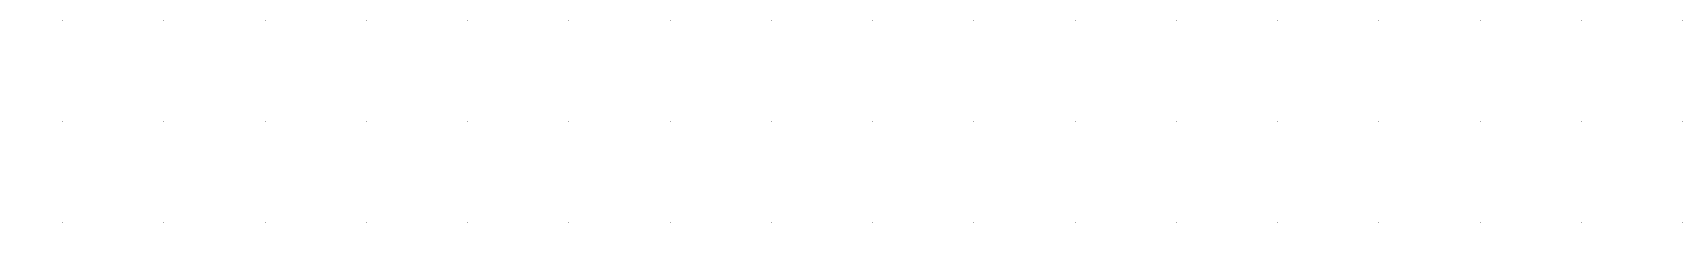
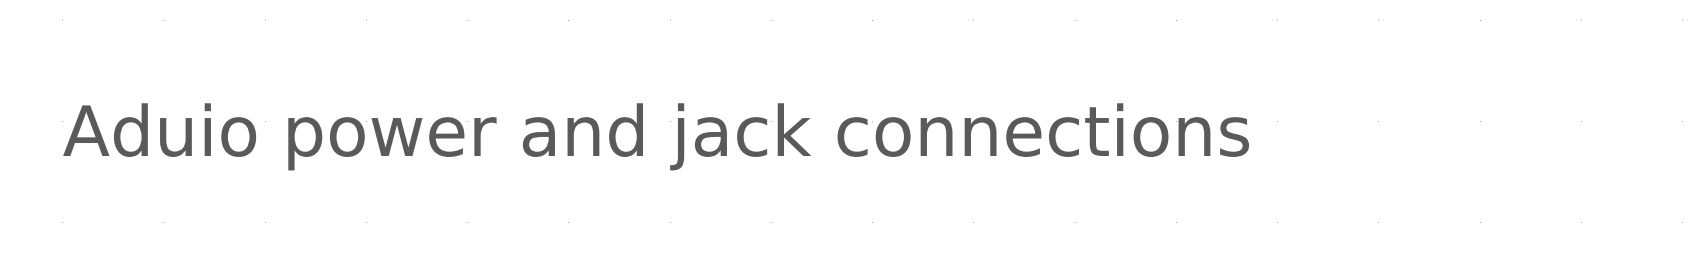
text: none -> Aduio power and jack connections (656, 136)

